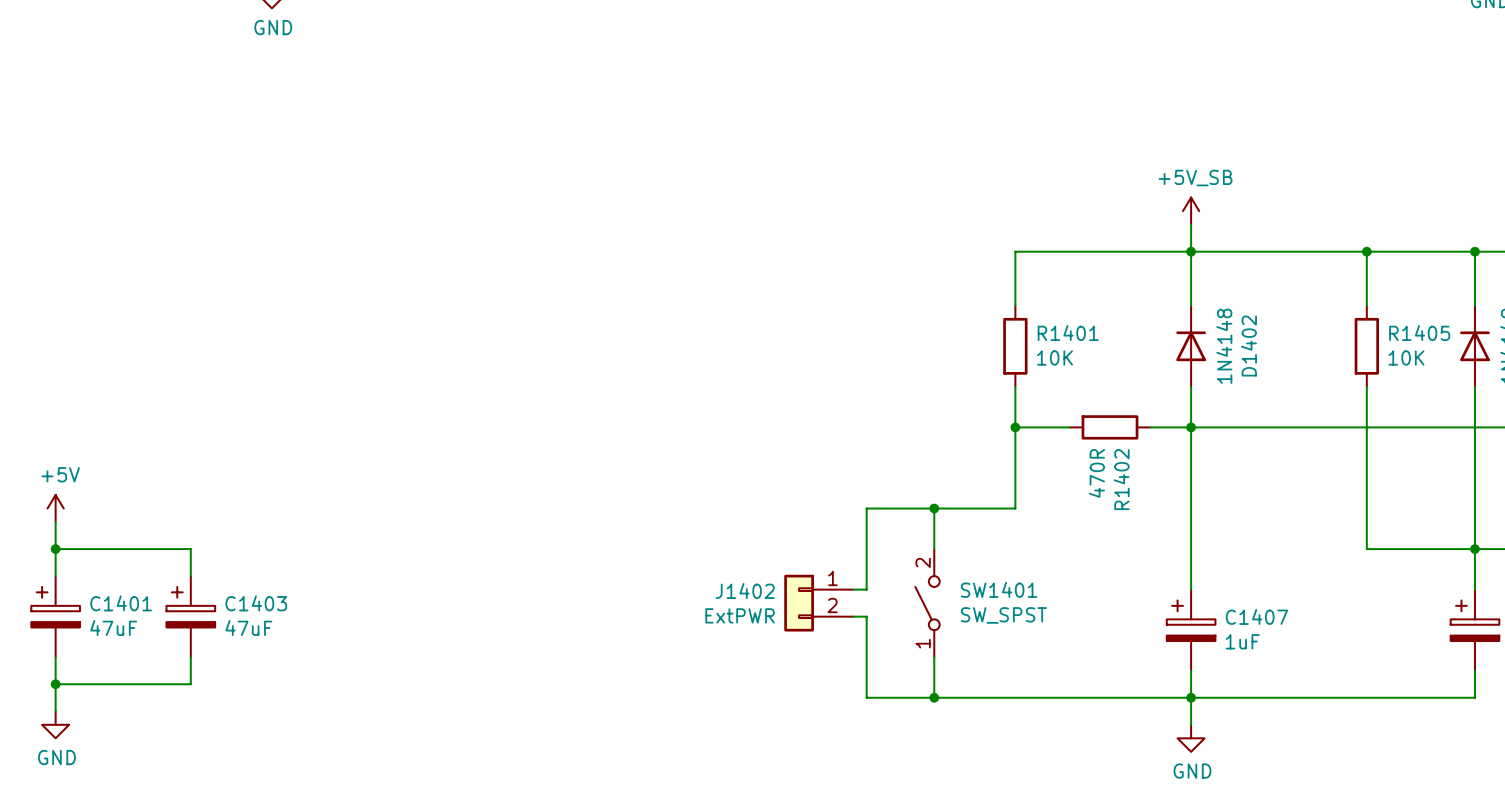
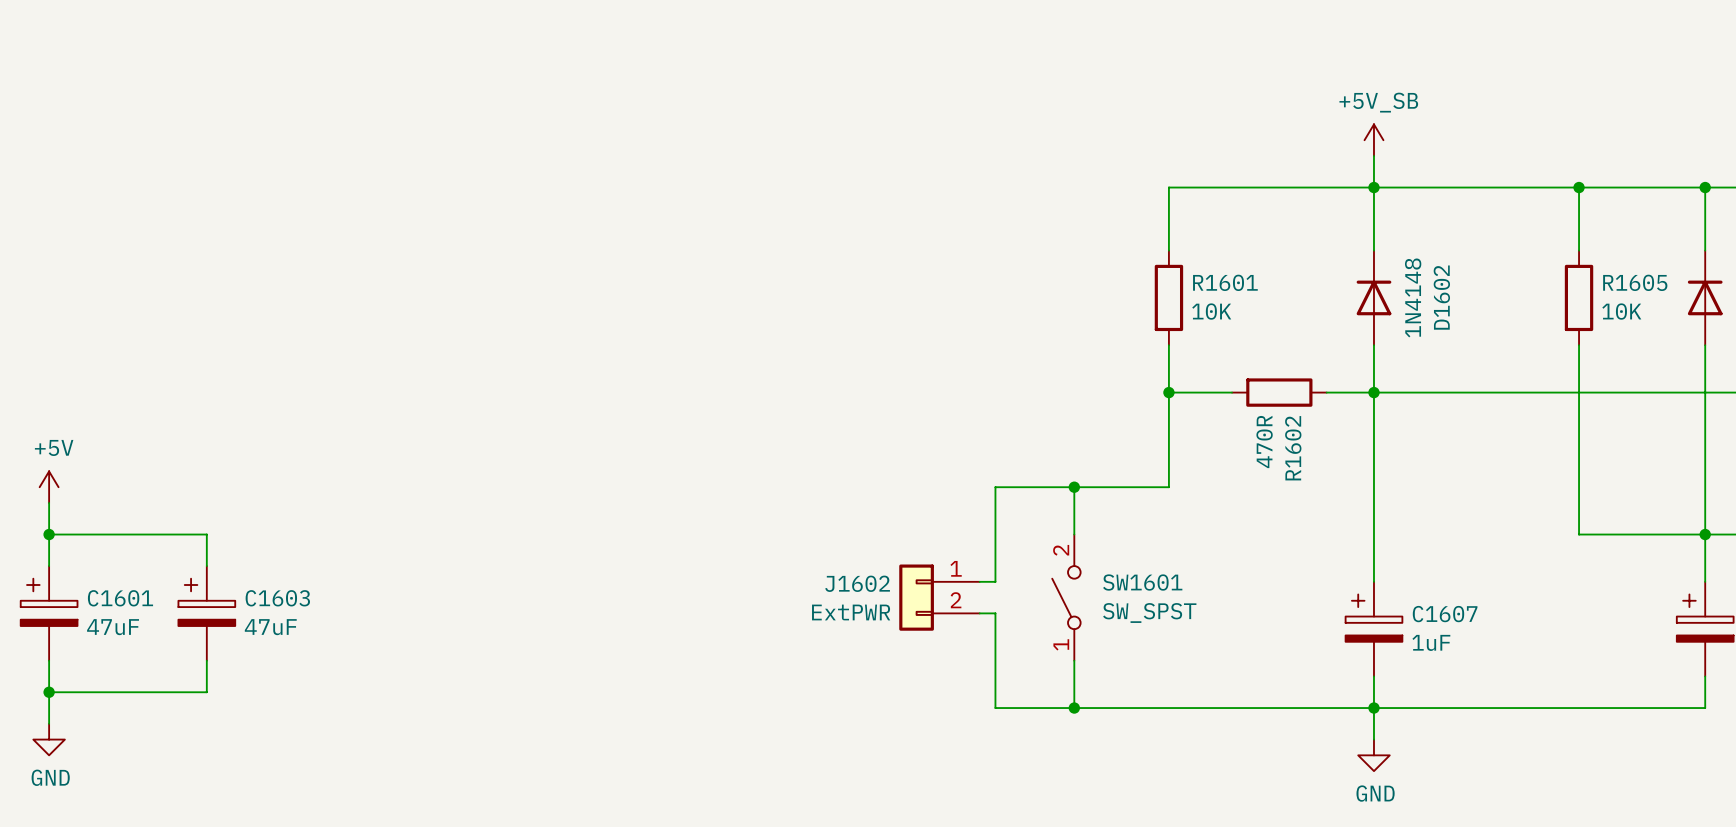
R1401 name: R1401 (1068, 333) -> R1601 (1225, 282)
R1405 name: R1405 (1419, 333) -> R1605 (1635, 282)
D1402 name: D1402 (1248, 345) -> D1602 (1441, 297)
R1402 name: R1402 (1121, 479) -> R1602 (1293, 448)
SW1401 name: SW1401 (999, 589) -> SW1601 (1142, 582)
J1402 name: J1402 (745, 590) -> J1602 (857, 583)
C1401 name: C1401 (121, 603) -> C1601 (120, 598)
C1403 name: C1403 (256, 603) -> C1603 (277, 598)
C1407 name: C1407 (1256, 616) -> C1607 (1445, 614)

